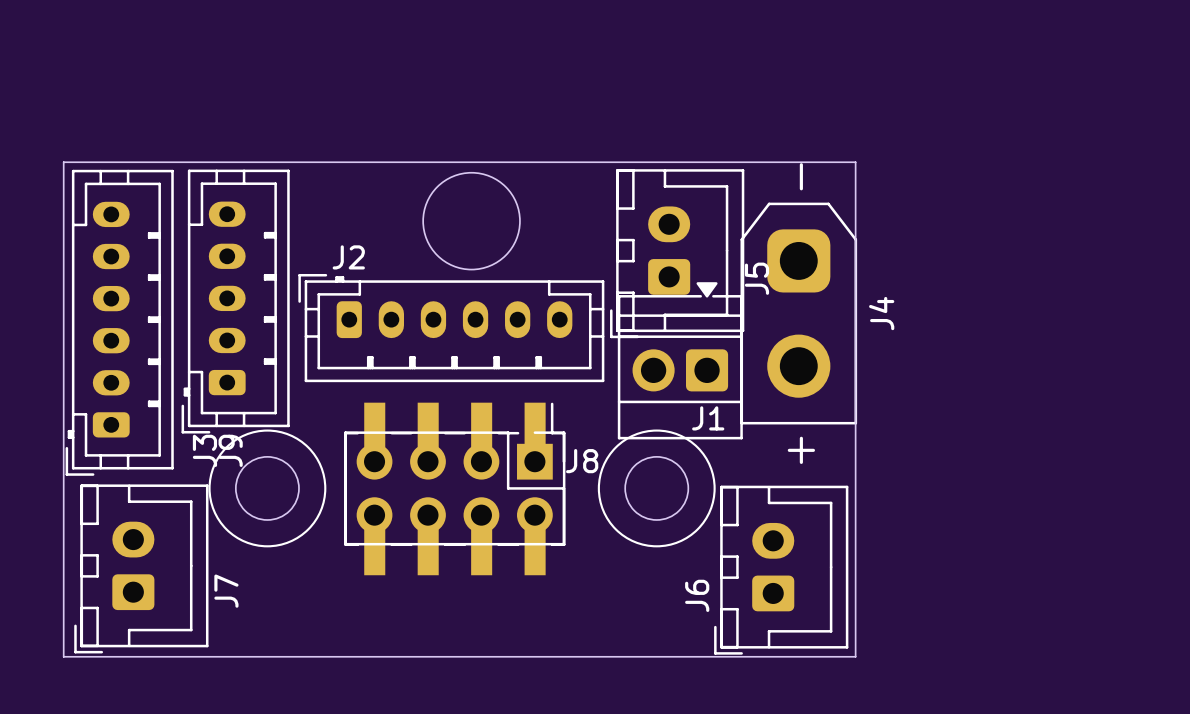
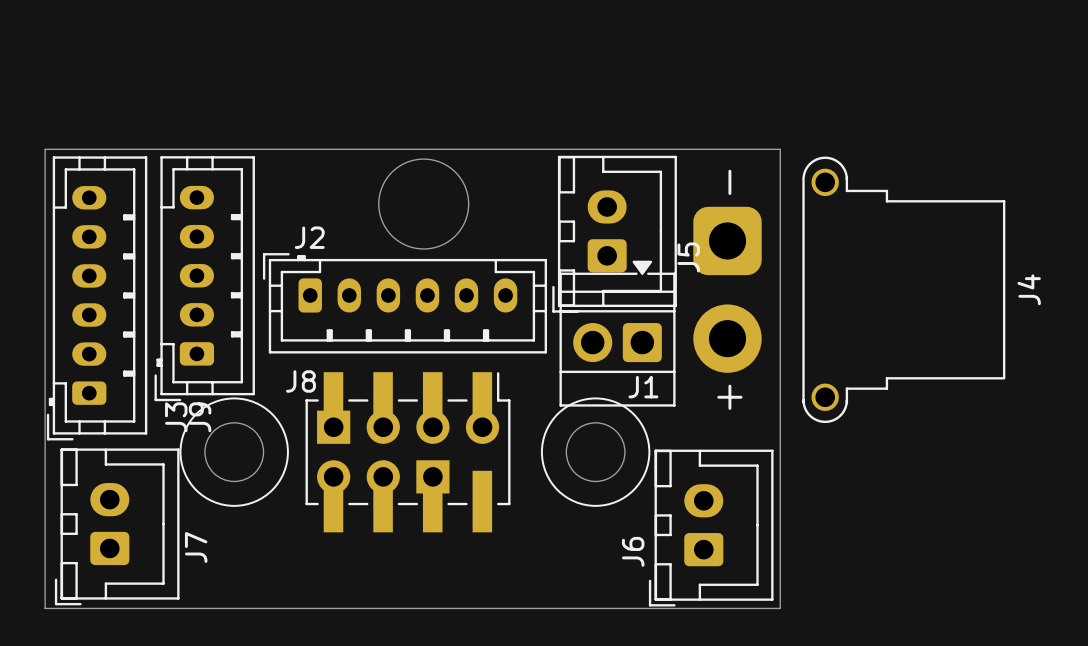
J4 footprint: [740, 202, 858, 425] -> [693, 156, 1006, 424]
J4 name position: J4 (881, 313) -> J4 (1029, 289)
J8 footprint: [344, 402, 566, 576] -> [305, 372, 511, 533]
J8 name position: J8 (582, 461) -> J8 (300, 381)
part: (454, 488) -> none

